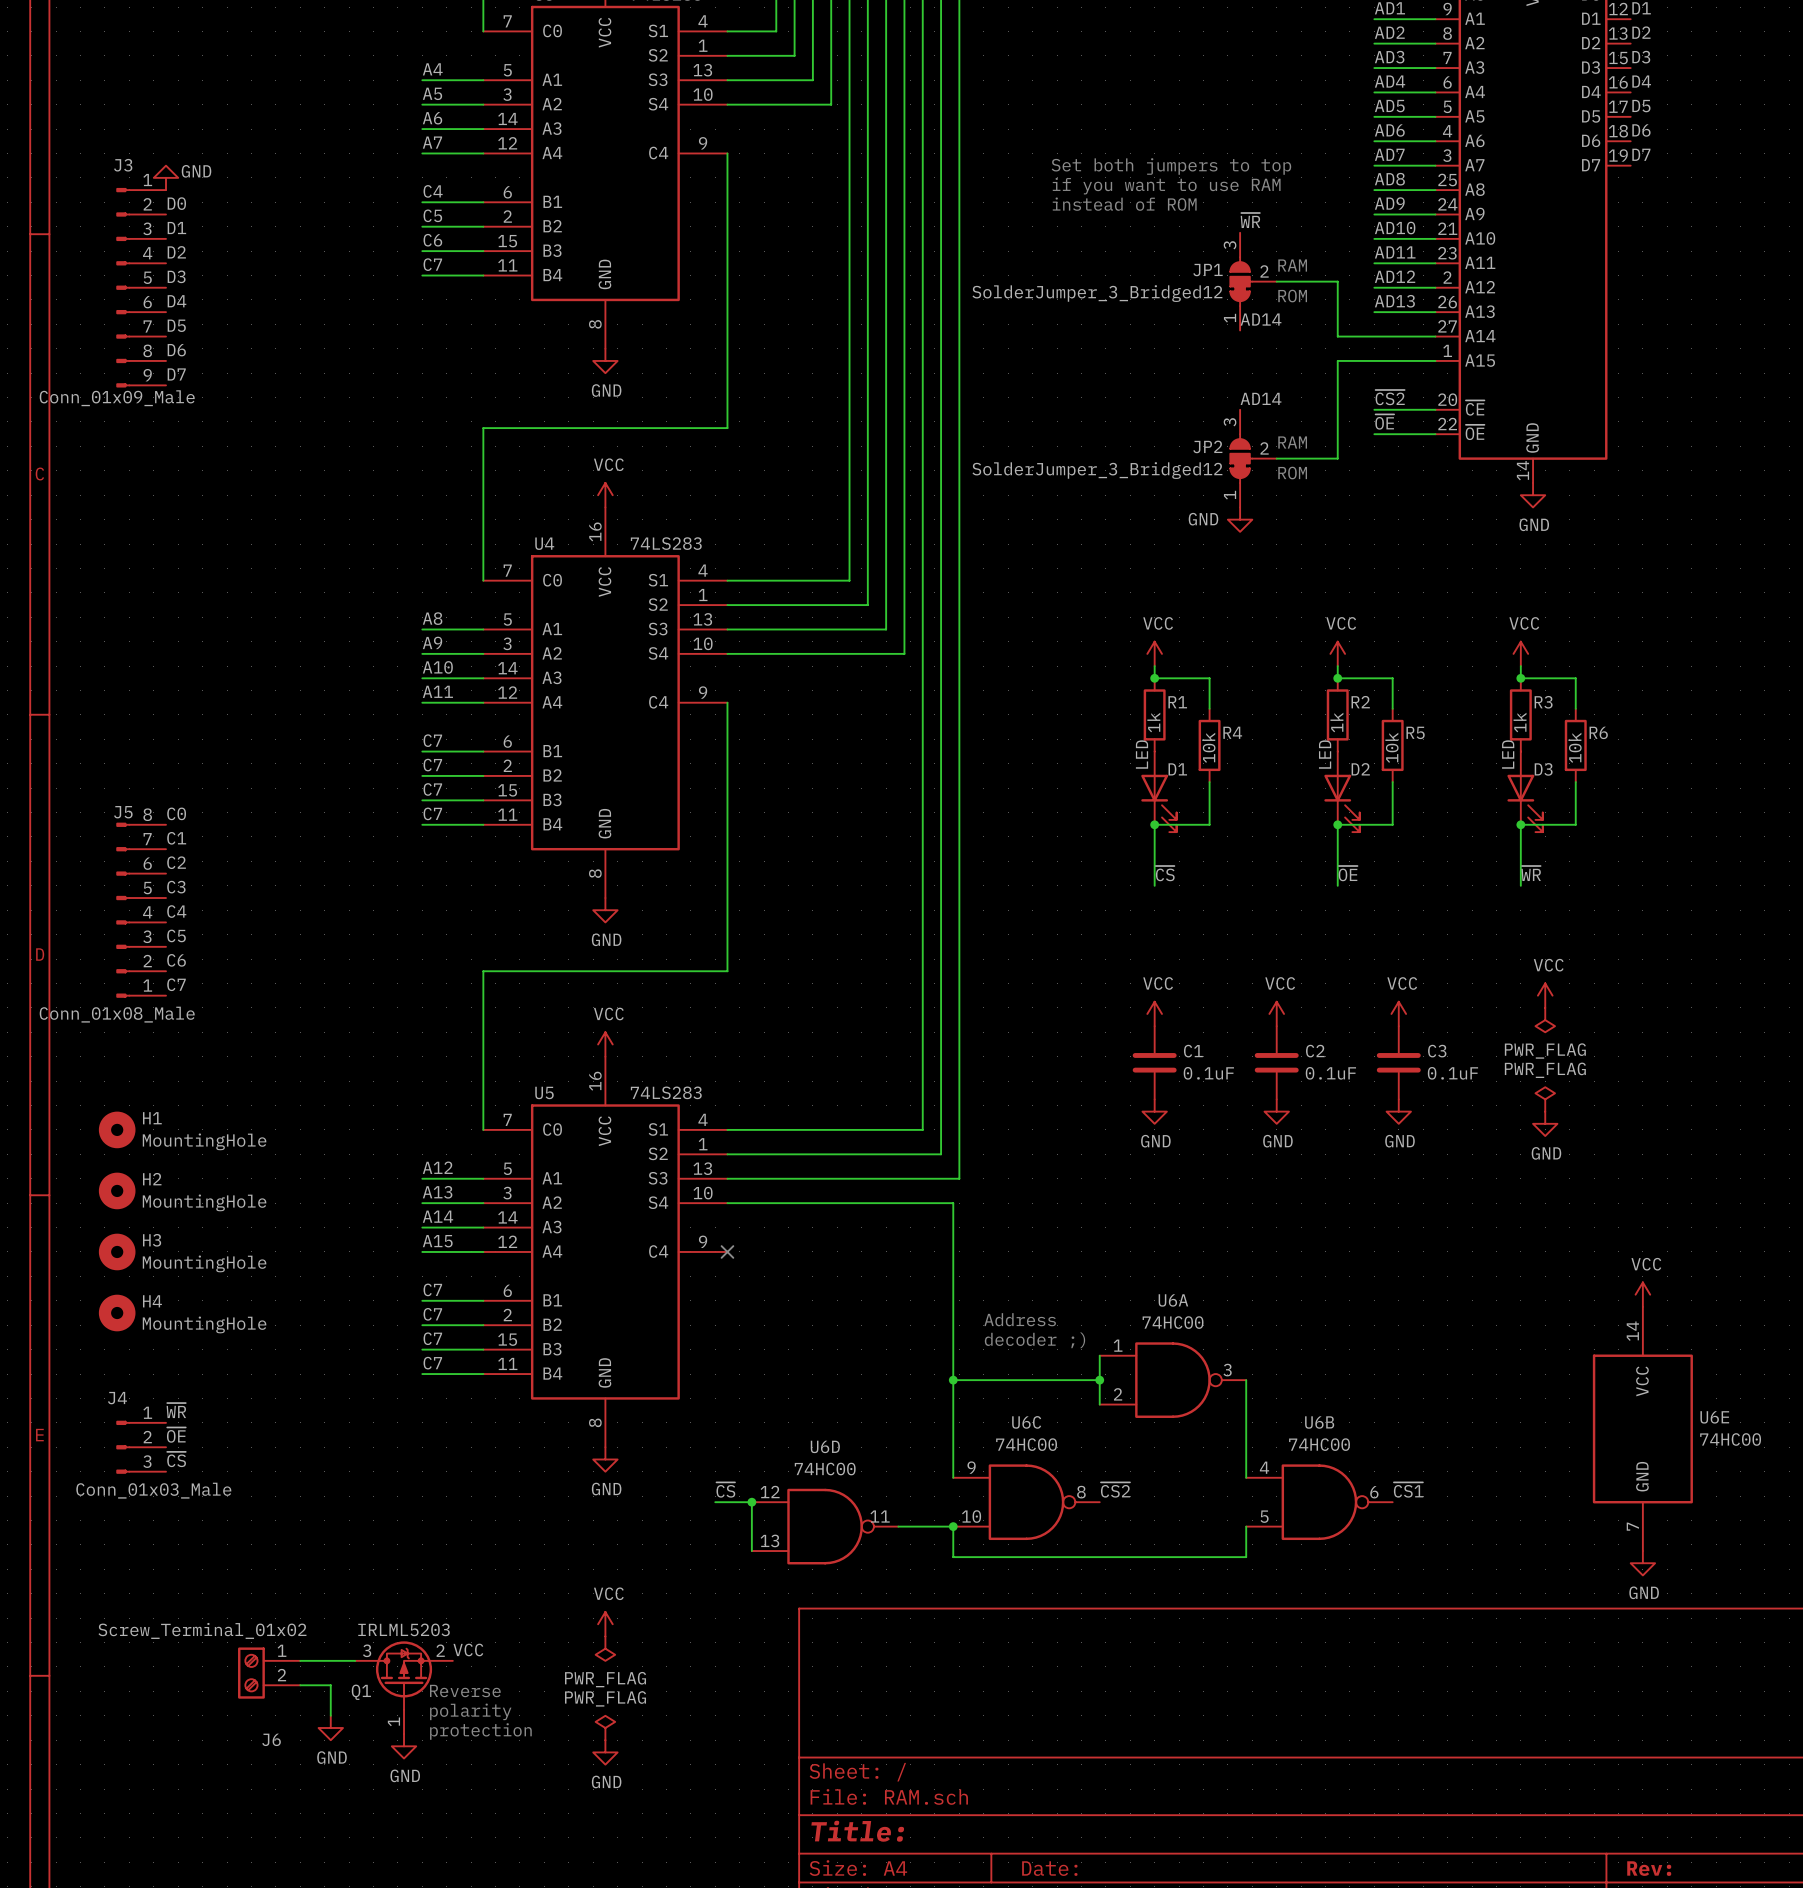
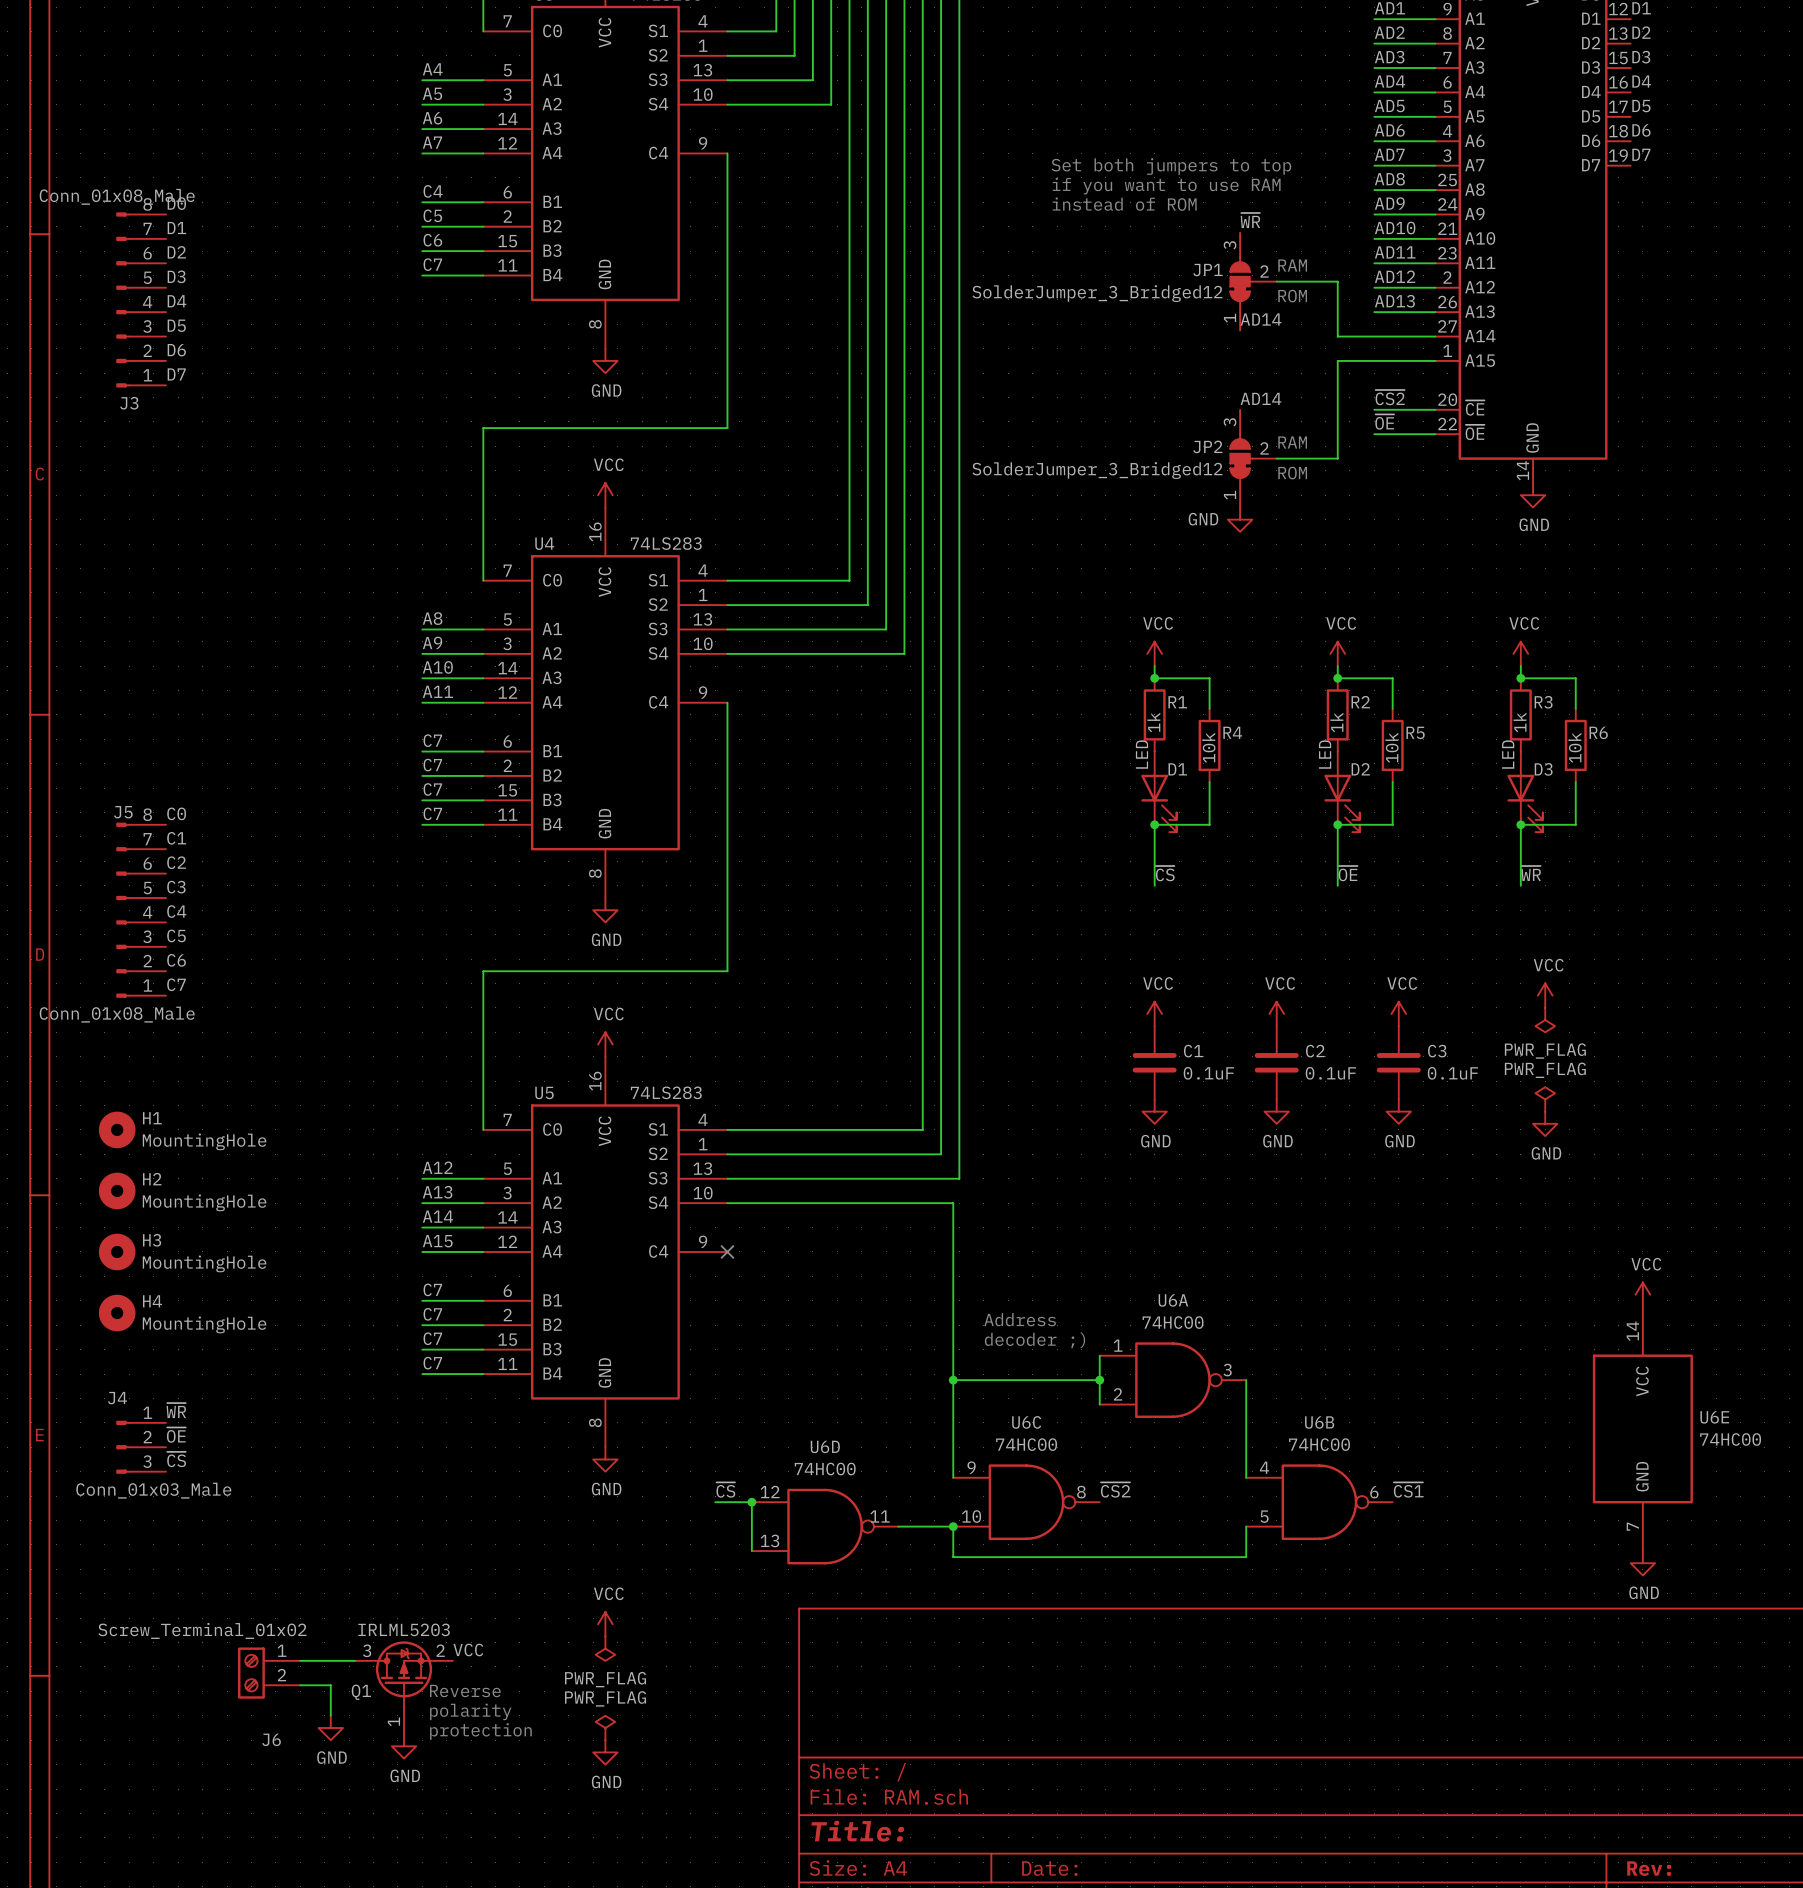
J3 name position: J3 (123, 165) -> J3 (129, 403)
power symbol: GND (166, 177) -> none
J3 symbol: [116, 188, 167, 388] -> [116, 212, 167, 388]
J3 value: Conn_01x09_Male (117, 398) -> Conn_01x08_Male (117, 196)

